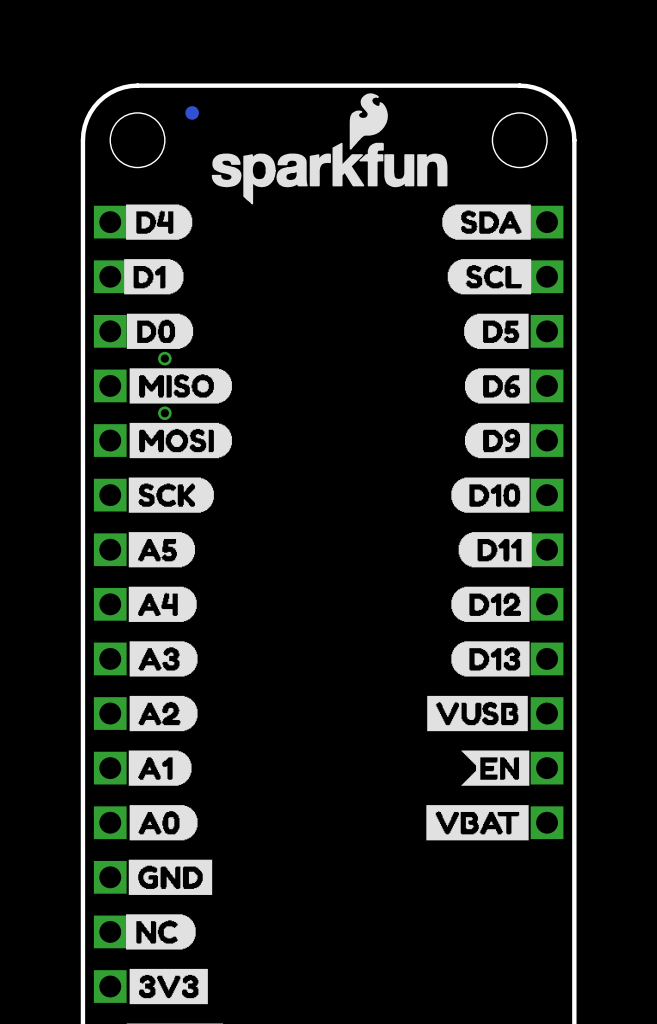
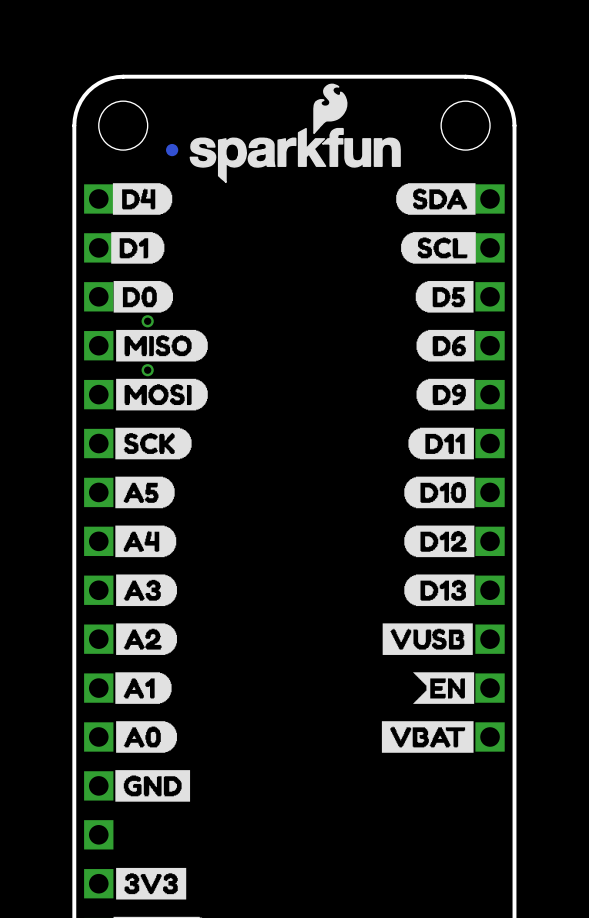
part position: (192, 112) -> (172, 150)
drawing position: (490, 495) -> (439, 492)
drawing position: (495, 549) -> (441, 443)
drawing: [126, 914, 196, 950] -> none

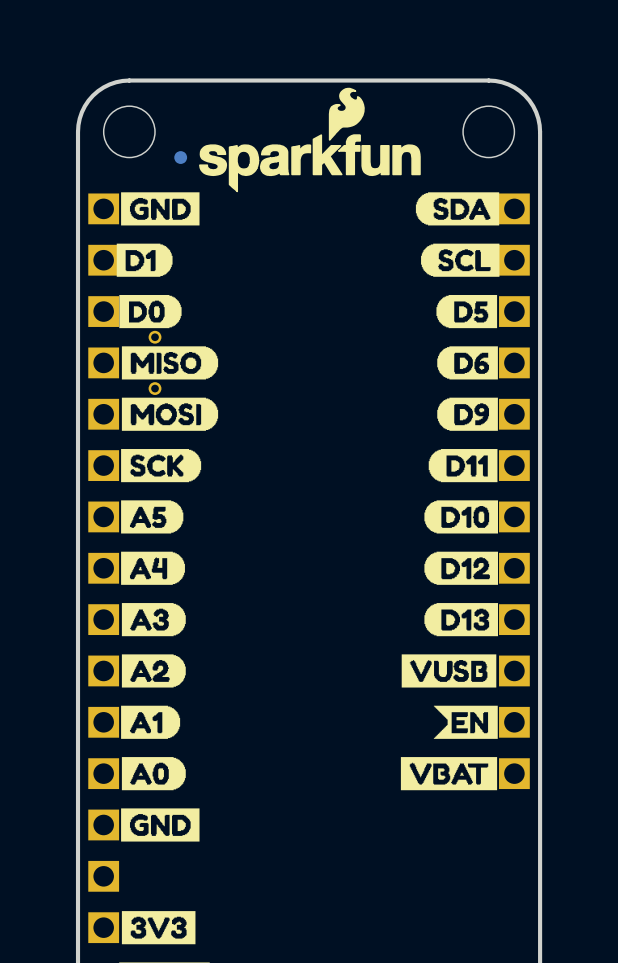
drawing shape: [112, 183, 173, 215] -> [121, 192, 200, 226]

